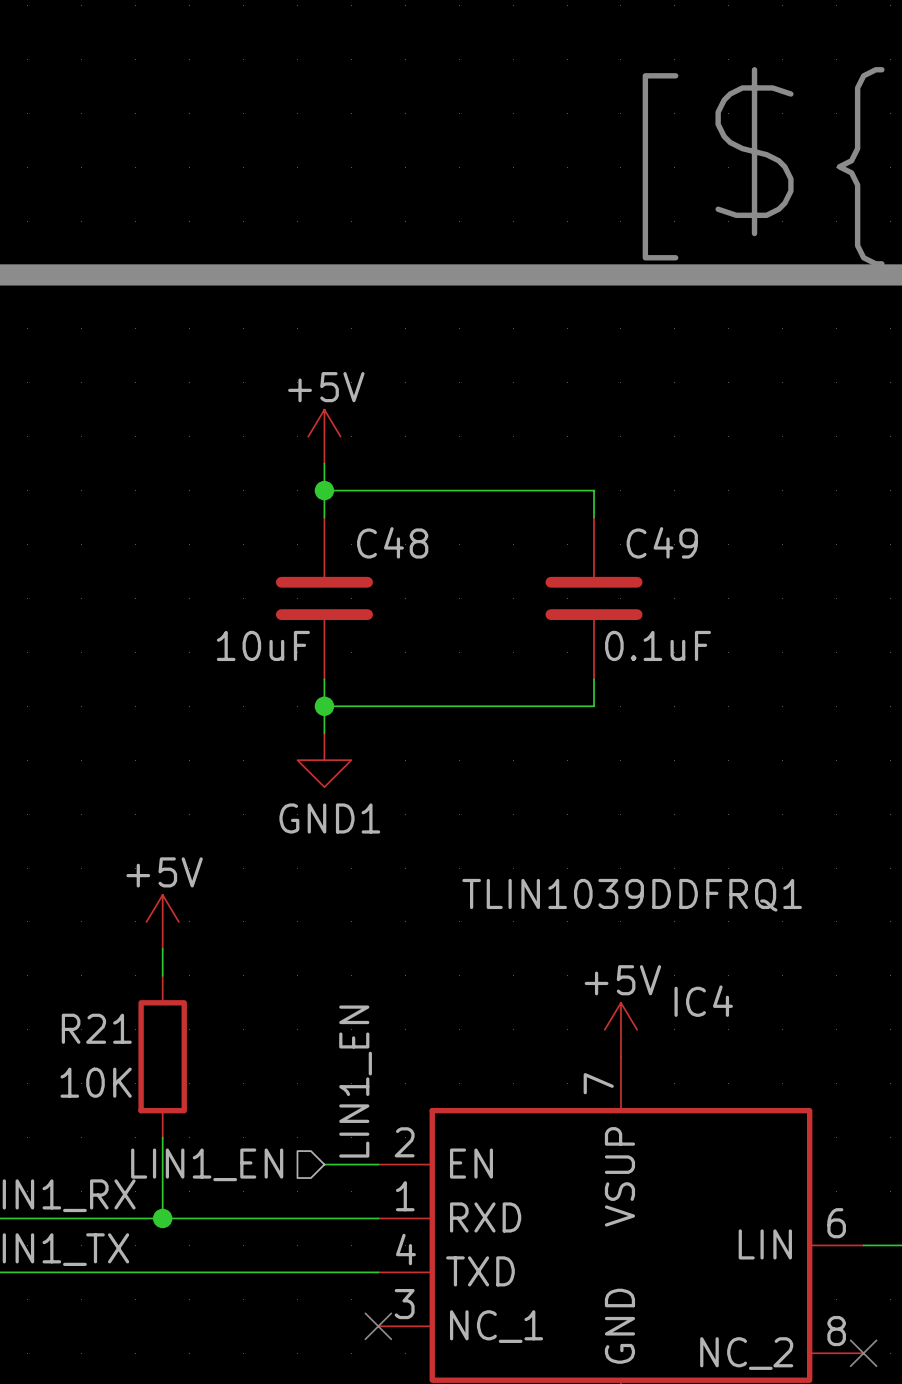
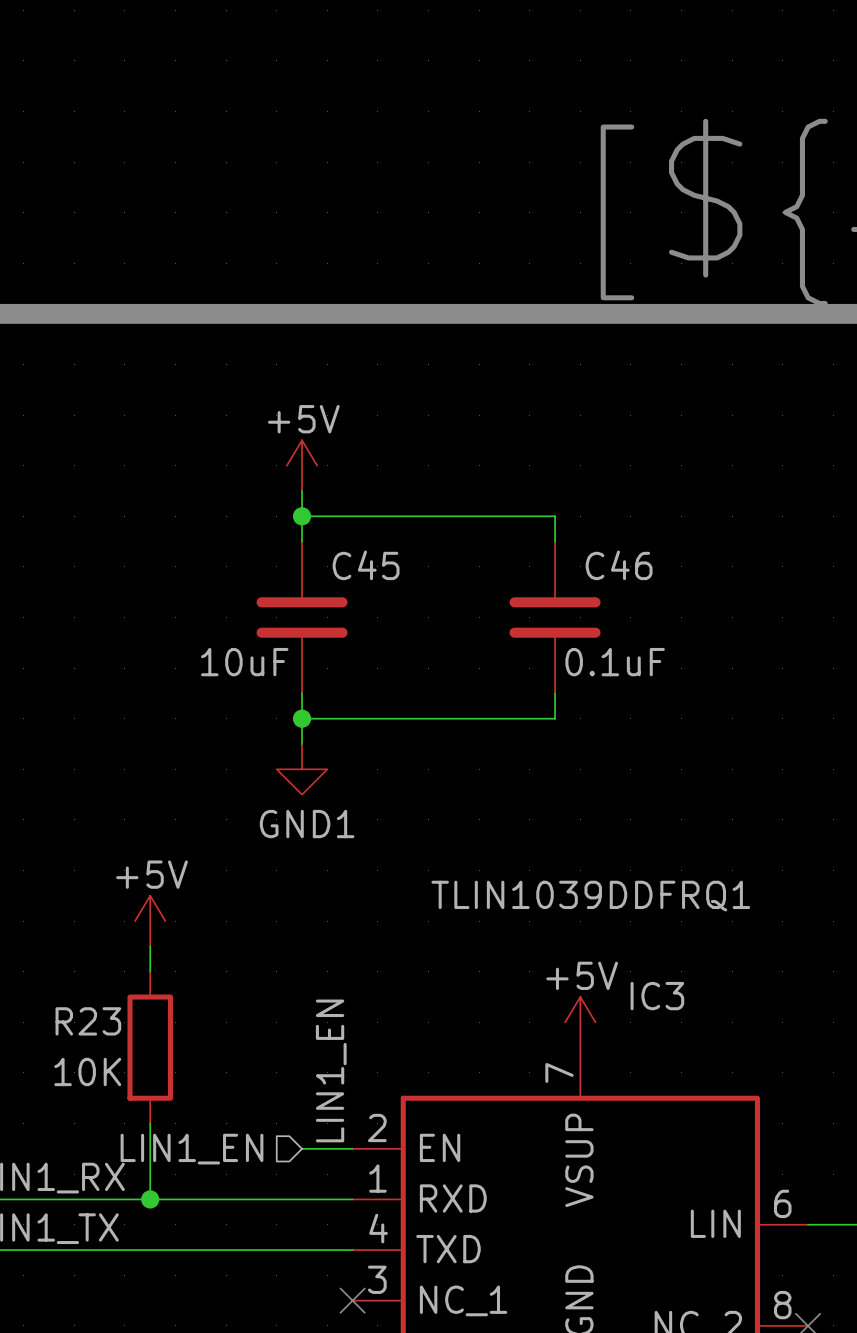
C48 name: C48 (392, 542) -> C45 (366, 565)
C49 name: C49 (662, 542) -> C46 (619, 565)
IC4 name: IC4 (703, 1001) -> IC3 (657, 996)
R21 name: R21 (96, 1028) -> R23 (88, 1021)

